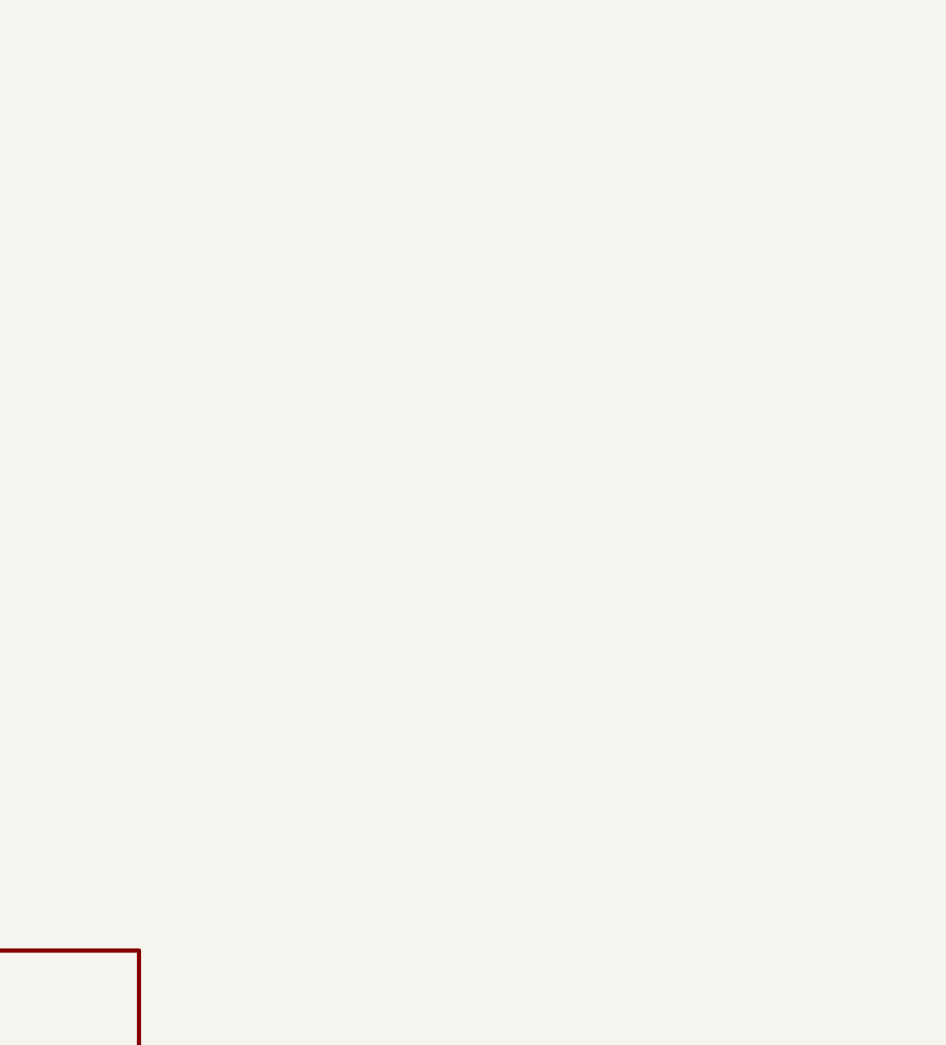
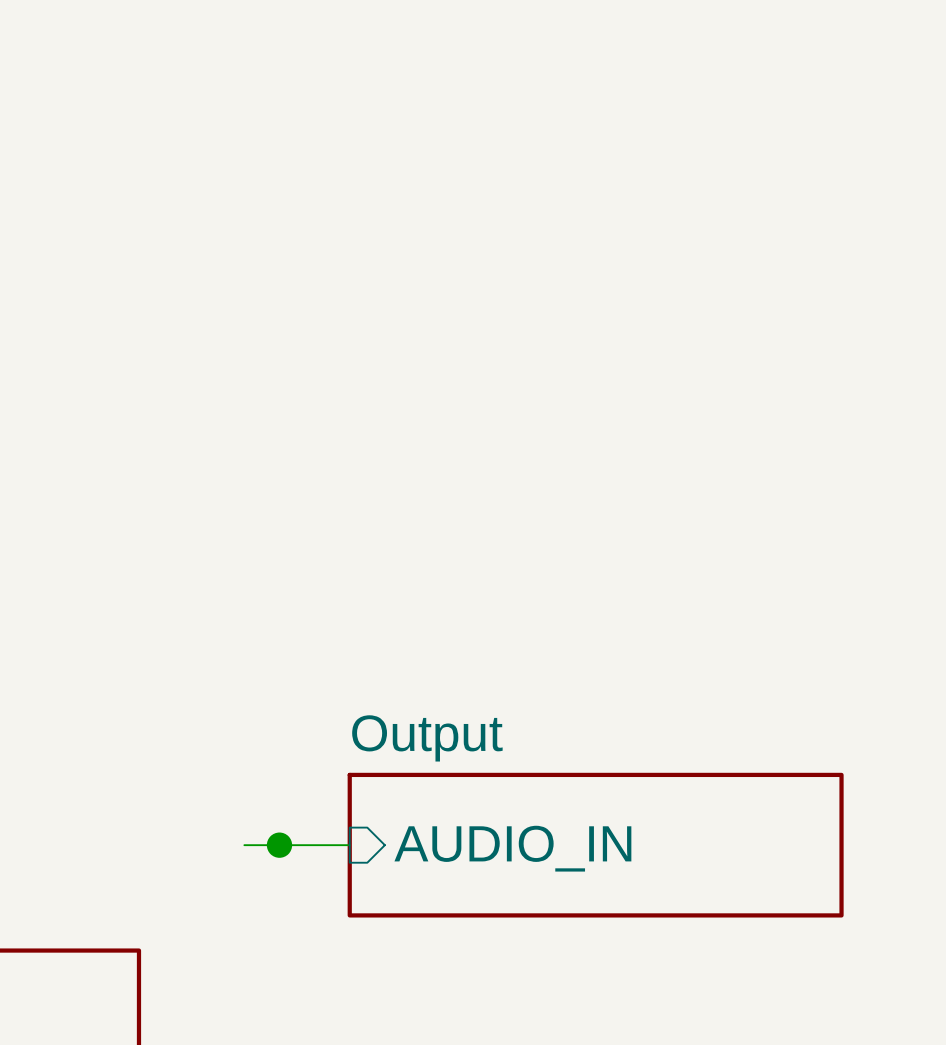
wire: none -> (244, 845) (349, 845)
junction: none -> (279, 845)
sheet Output: none -> (595, 845)
sheet pin: none -> AUDIO_IN (512, 848)

